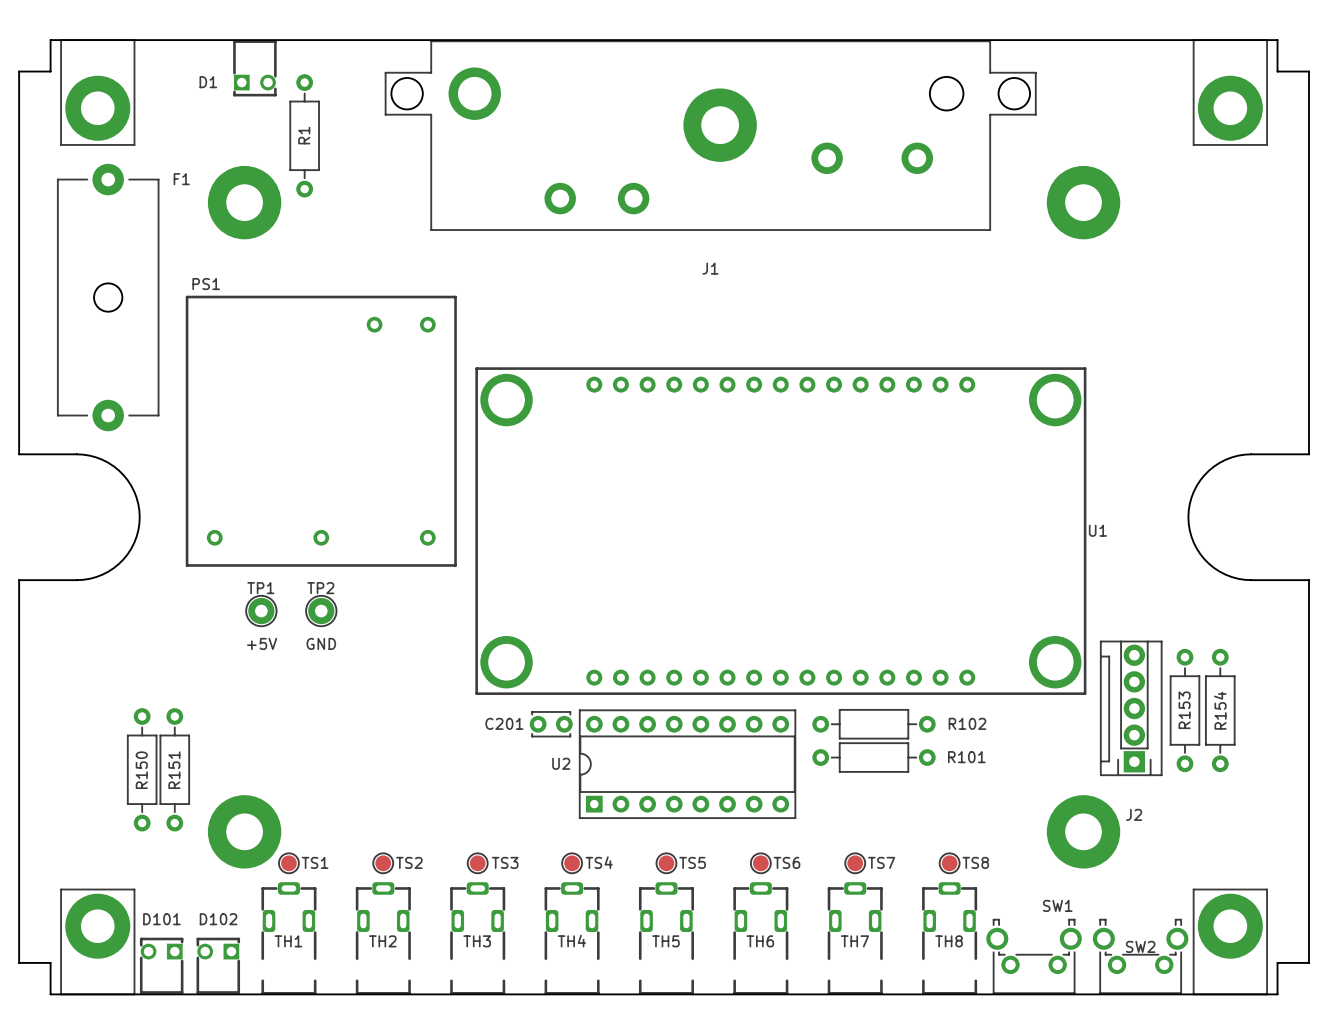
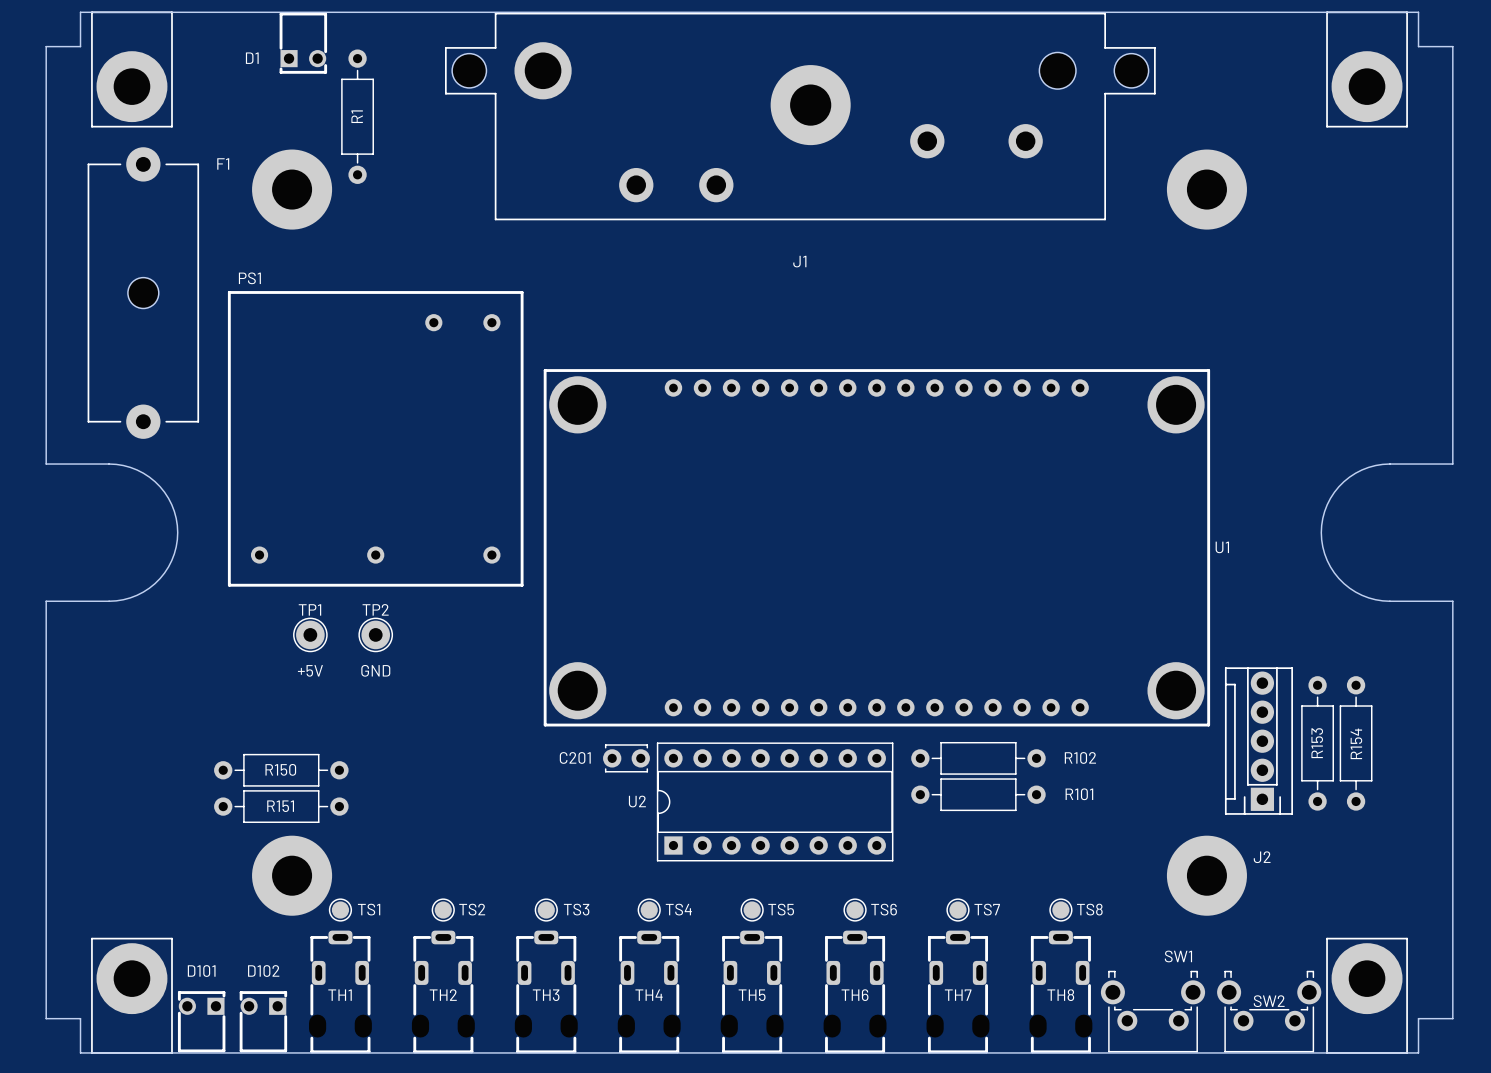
R150 rotation: 0° (142, 769) -> 90° clockwise (281, 770)
R150 position: (142, 769) -> (281, 770)
R151 rotation: 0° (174, 769) -> 90° clockwise (281, 806)

